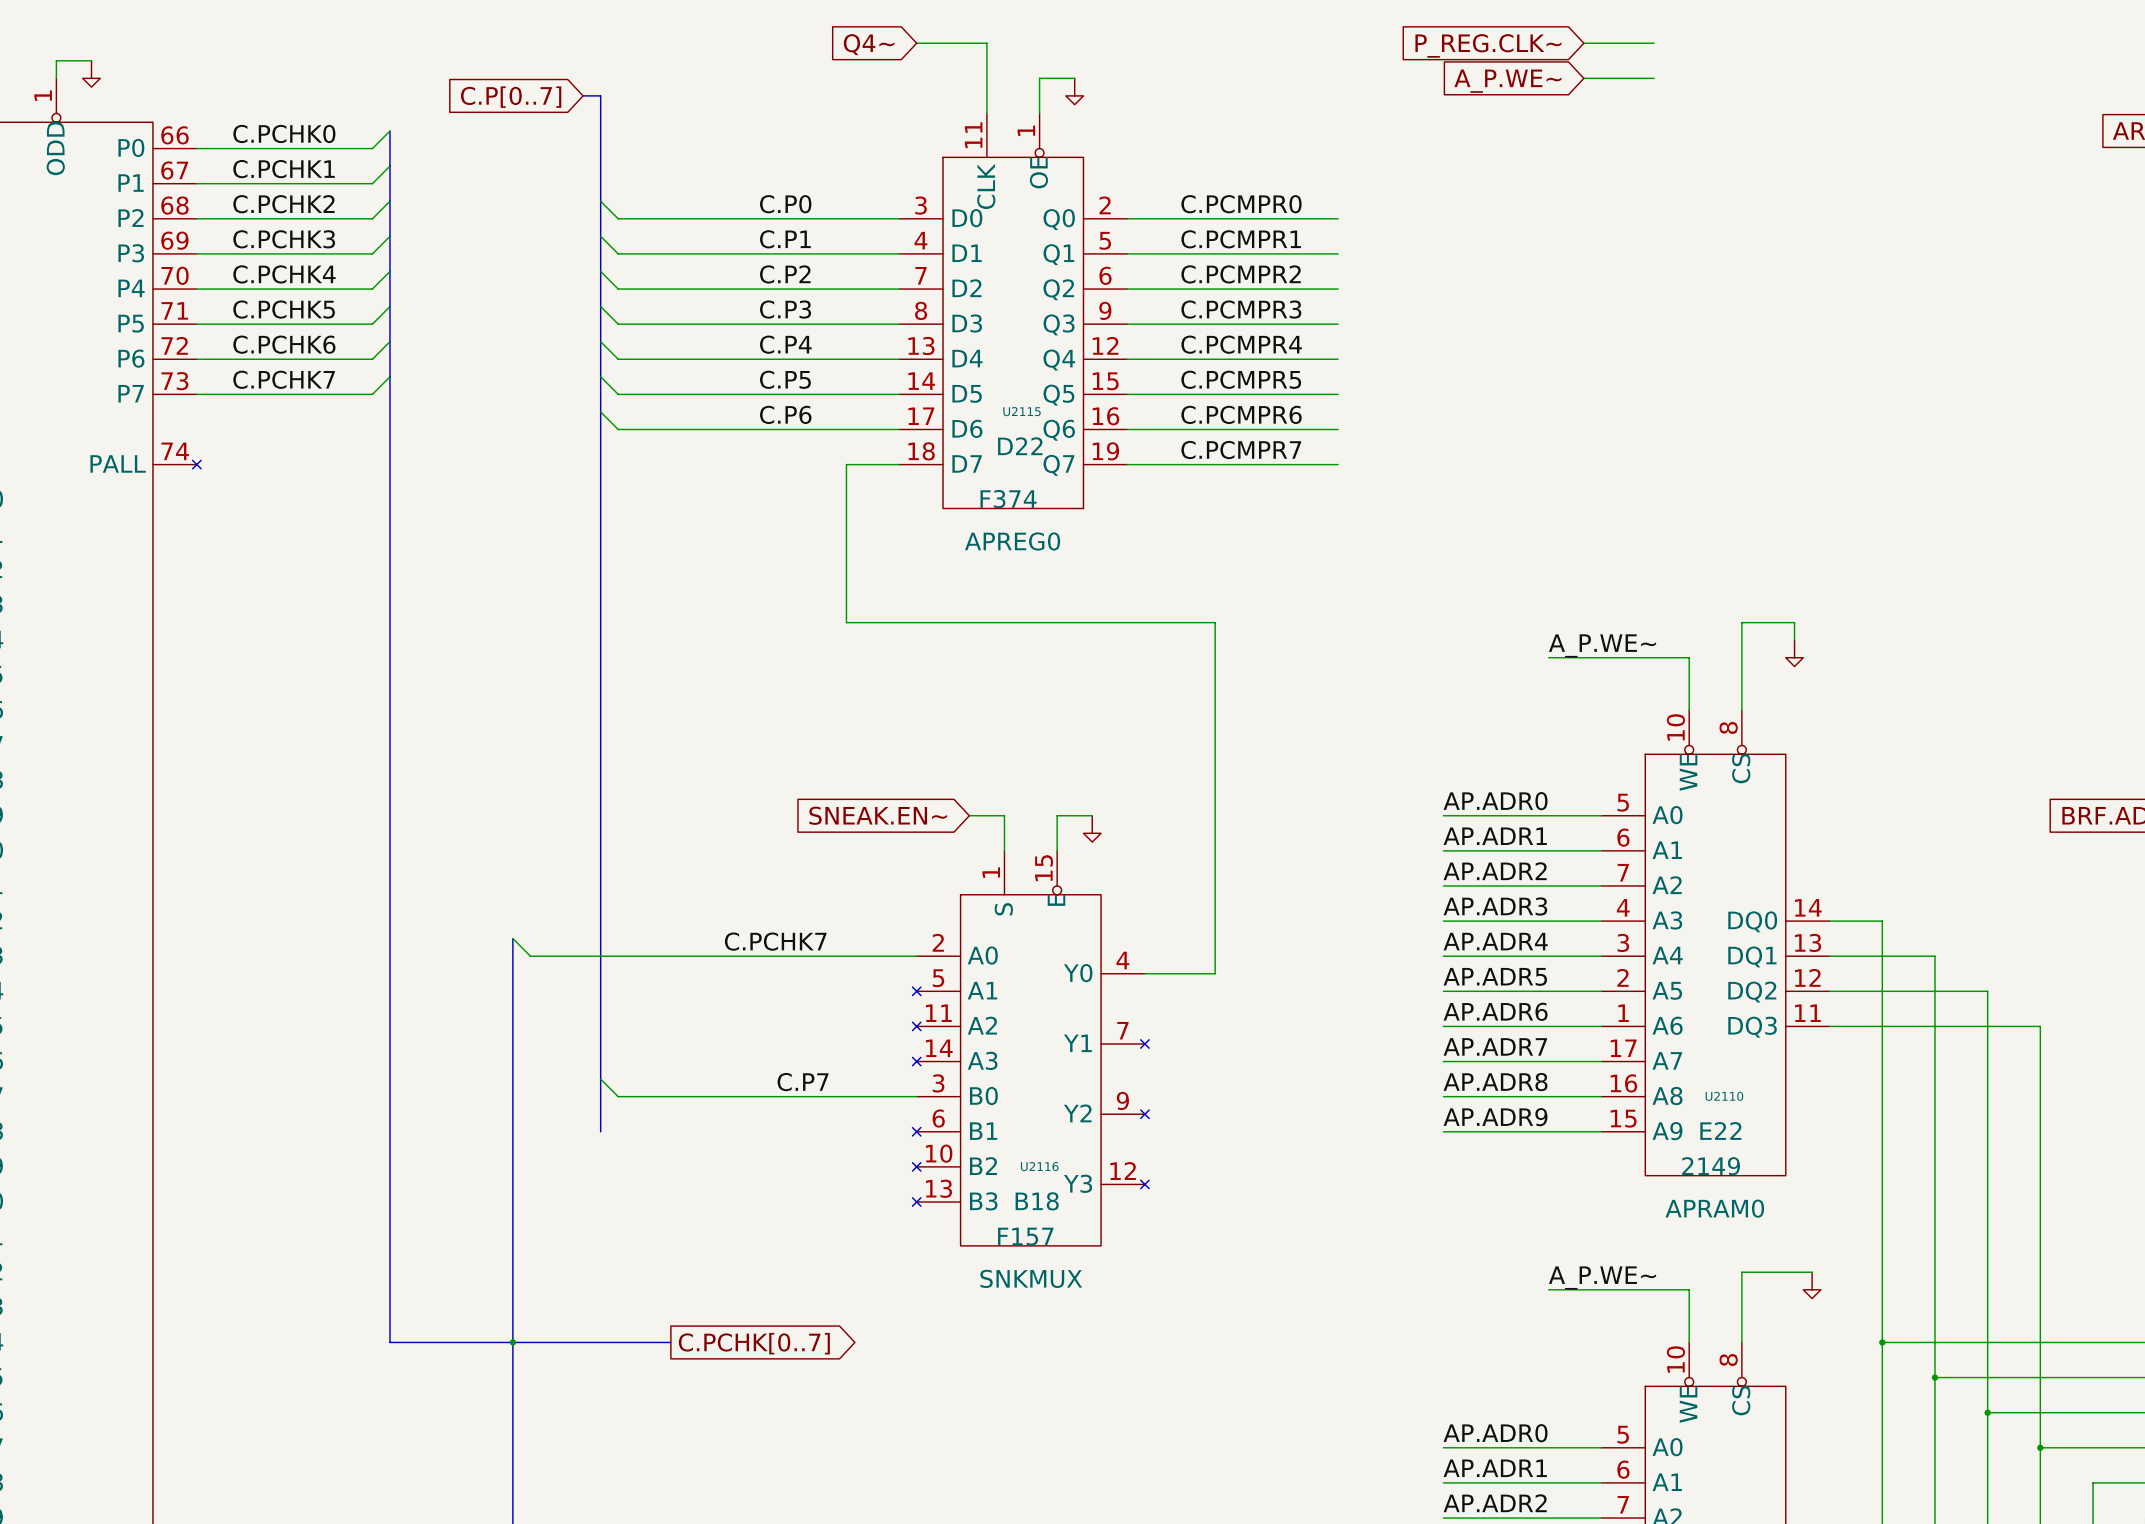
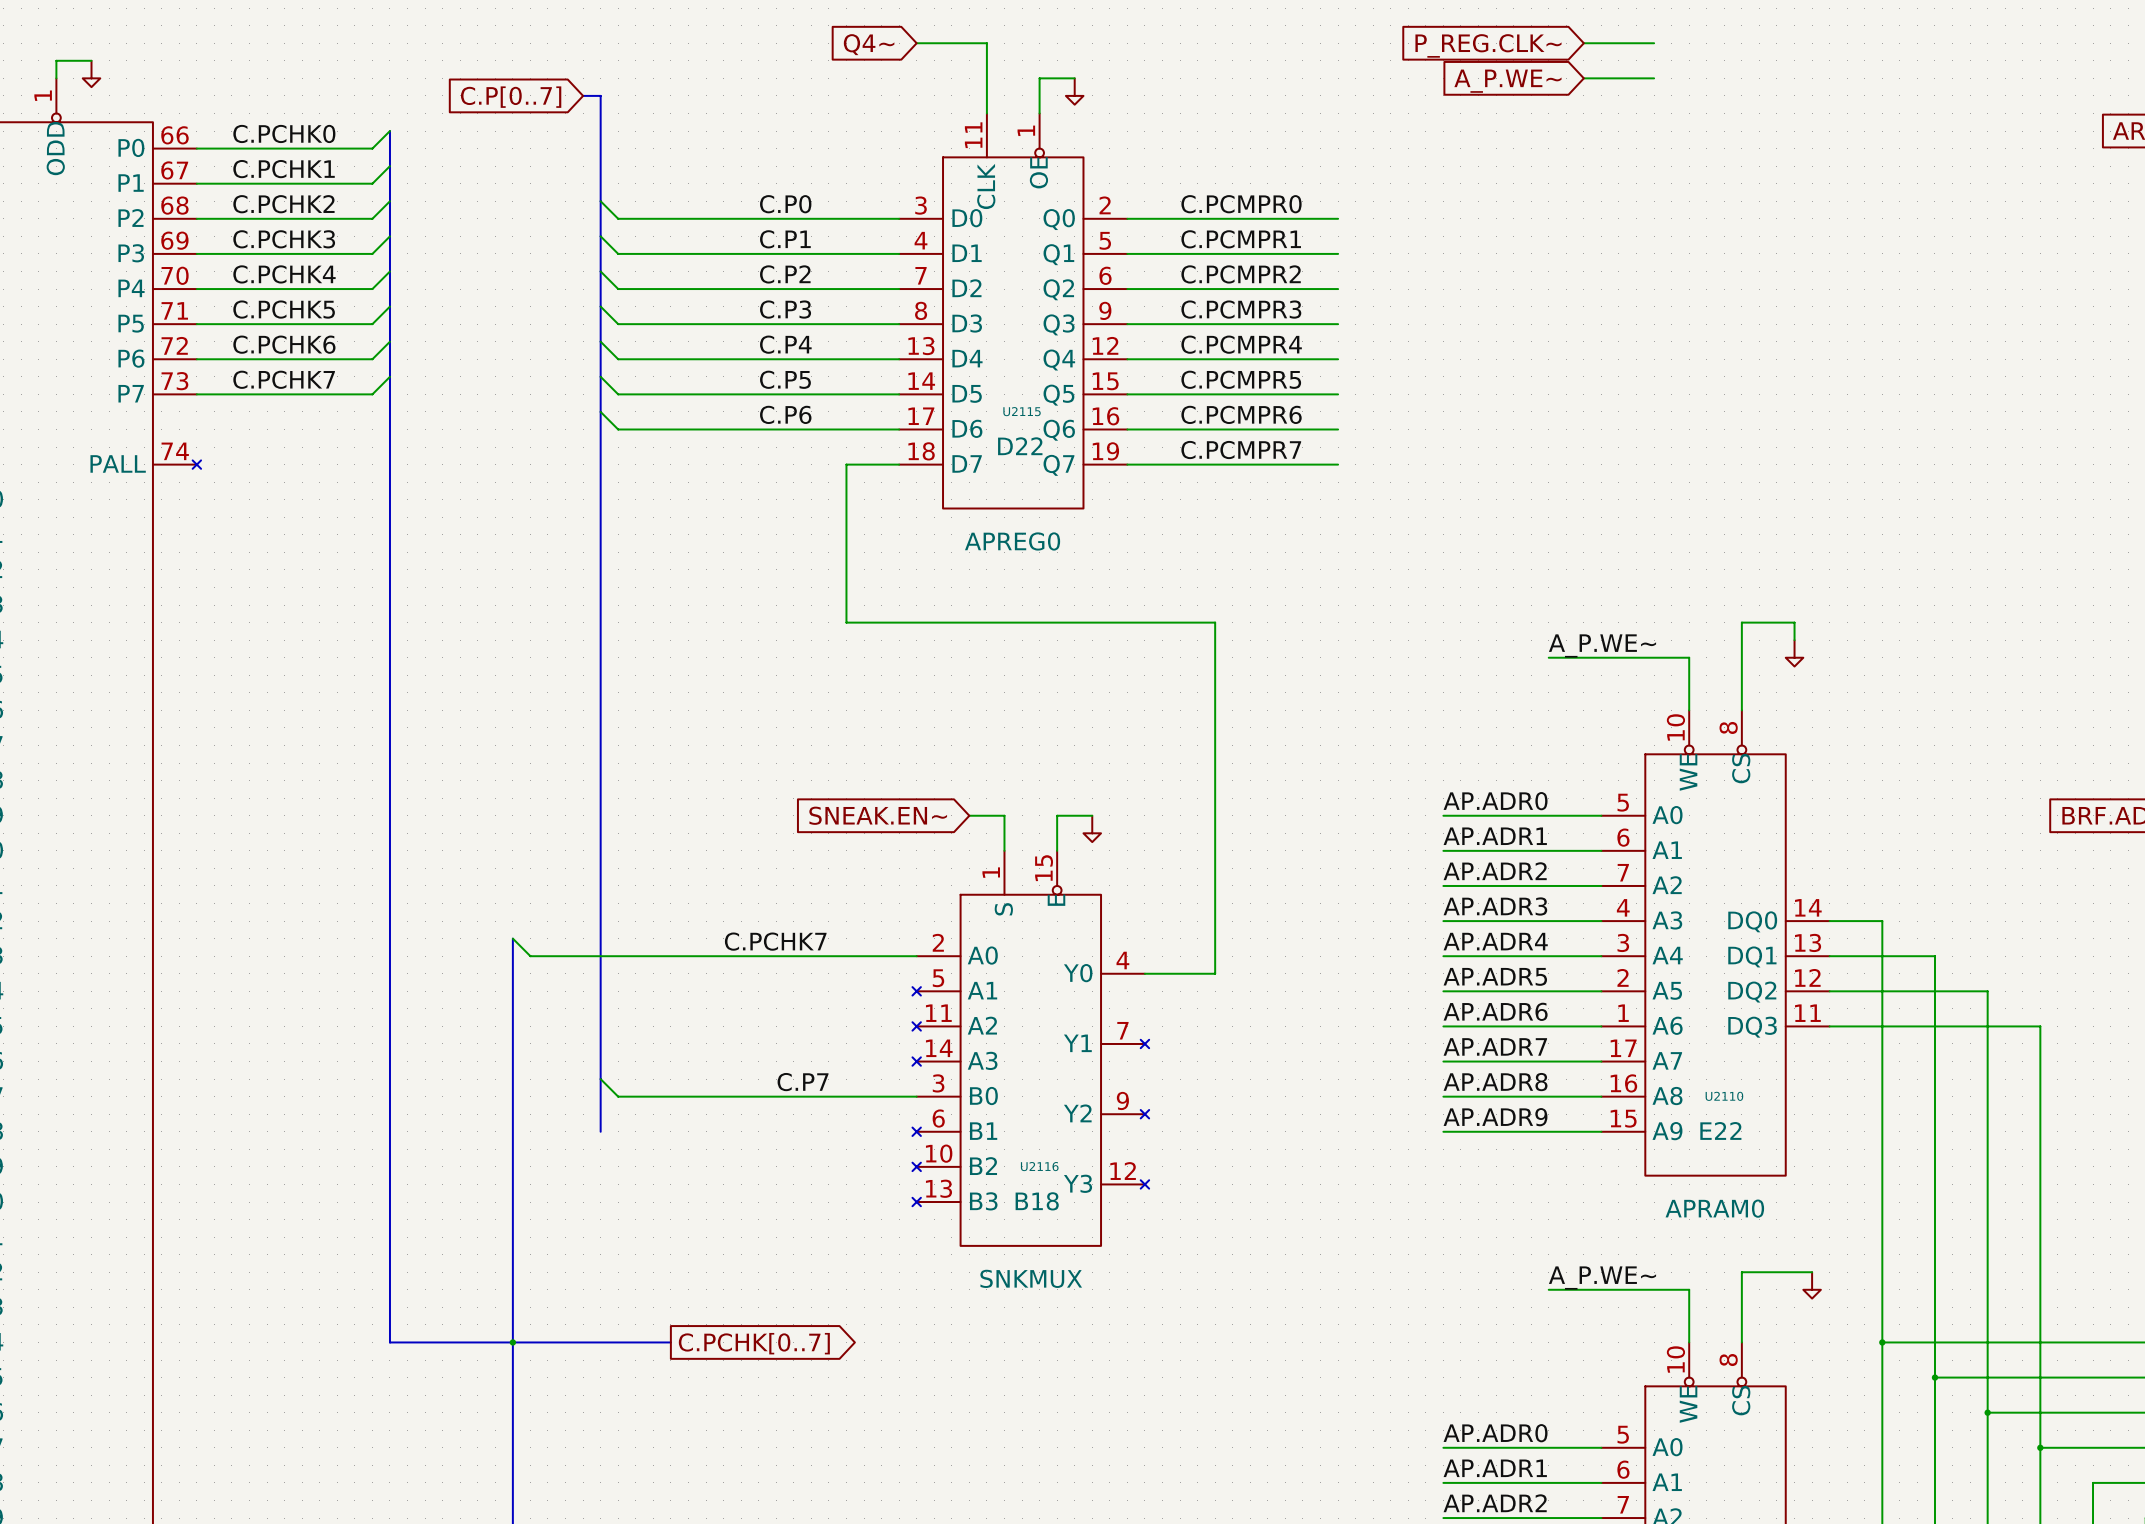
U2115 value: F374 (1008, 499) -> none
U2110 value: 2149 (1711, 1166) -> none
U2116 value: F157 (1025, 1236) -> none

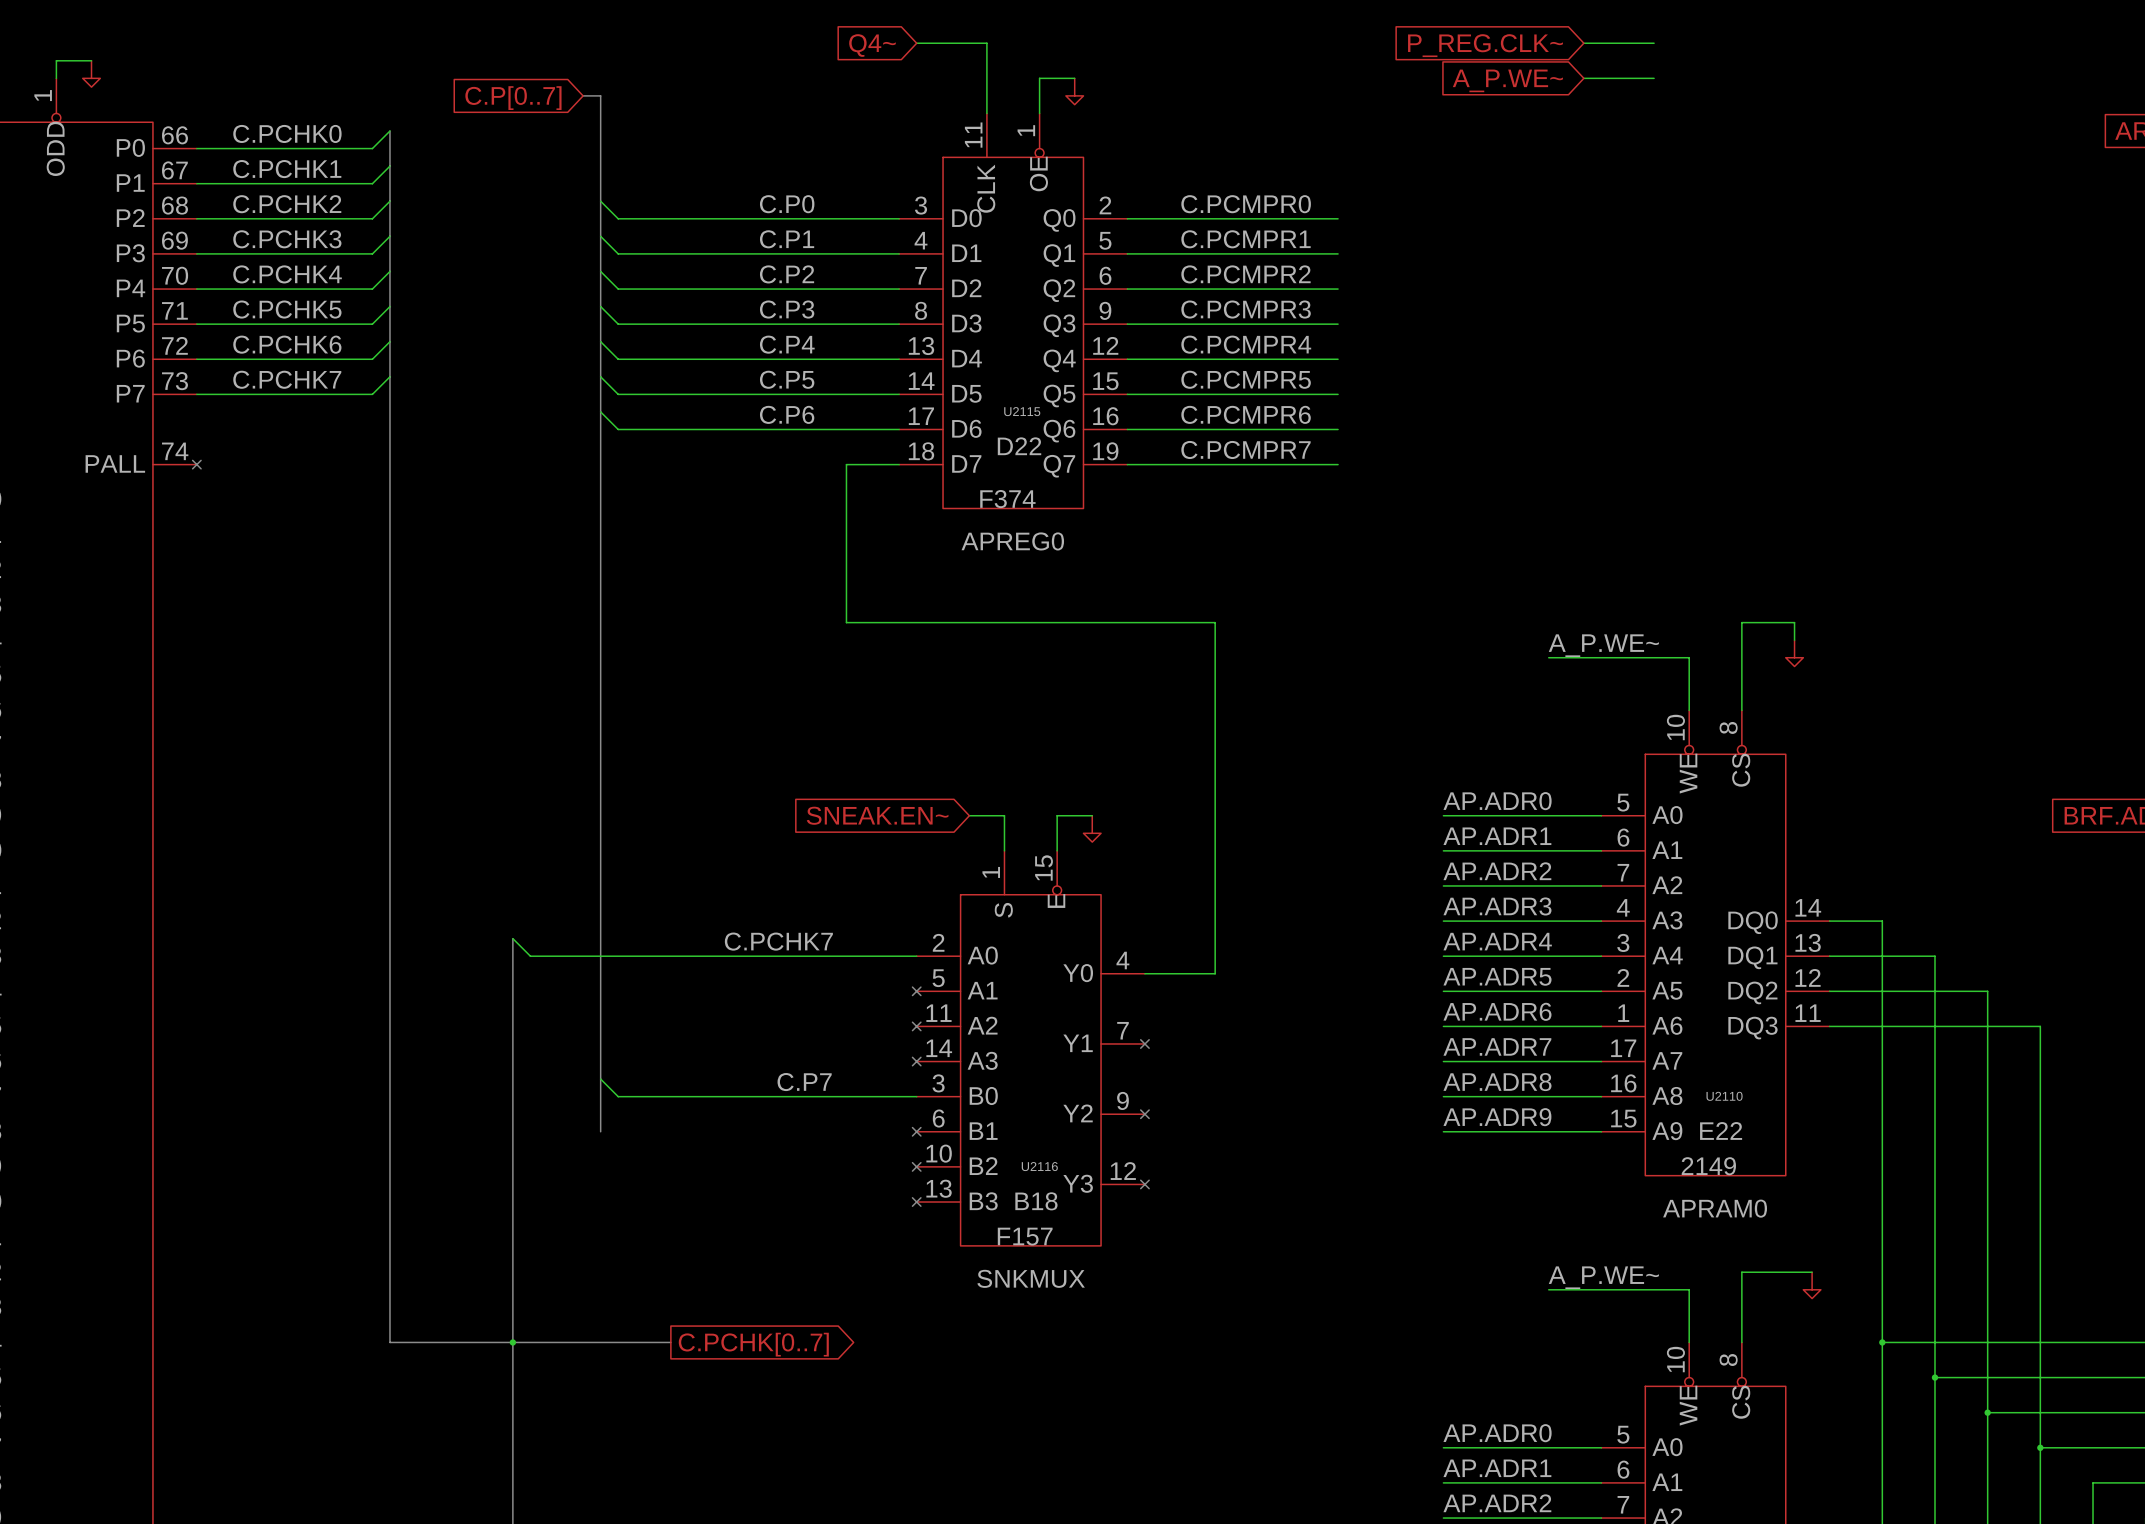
U2115 value: none -> F374 (1007, 499)
U2110 value: none -> 2149 (1708, 1166)
U2116 value: none -> F157 (1025, 1236)

